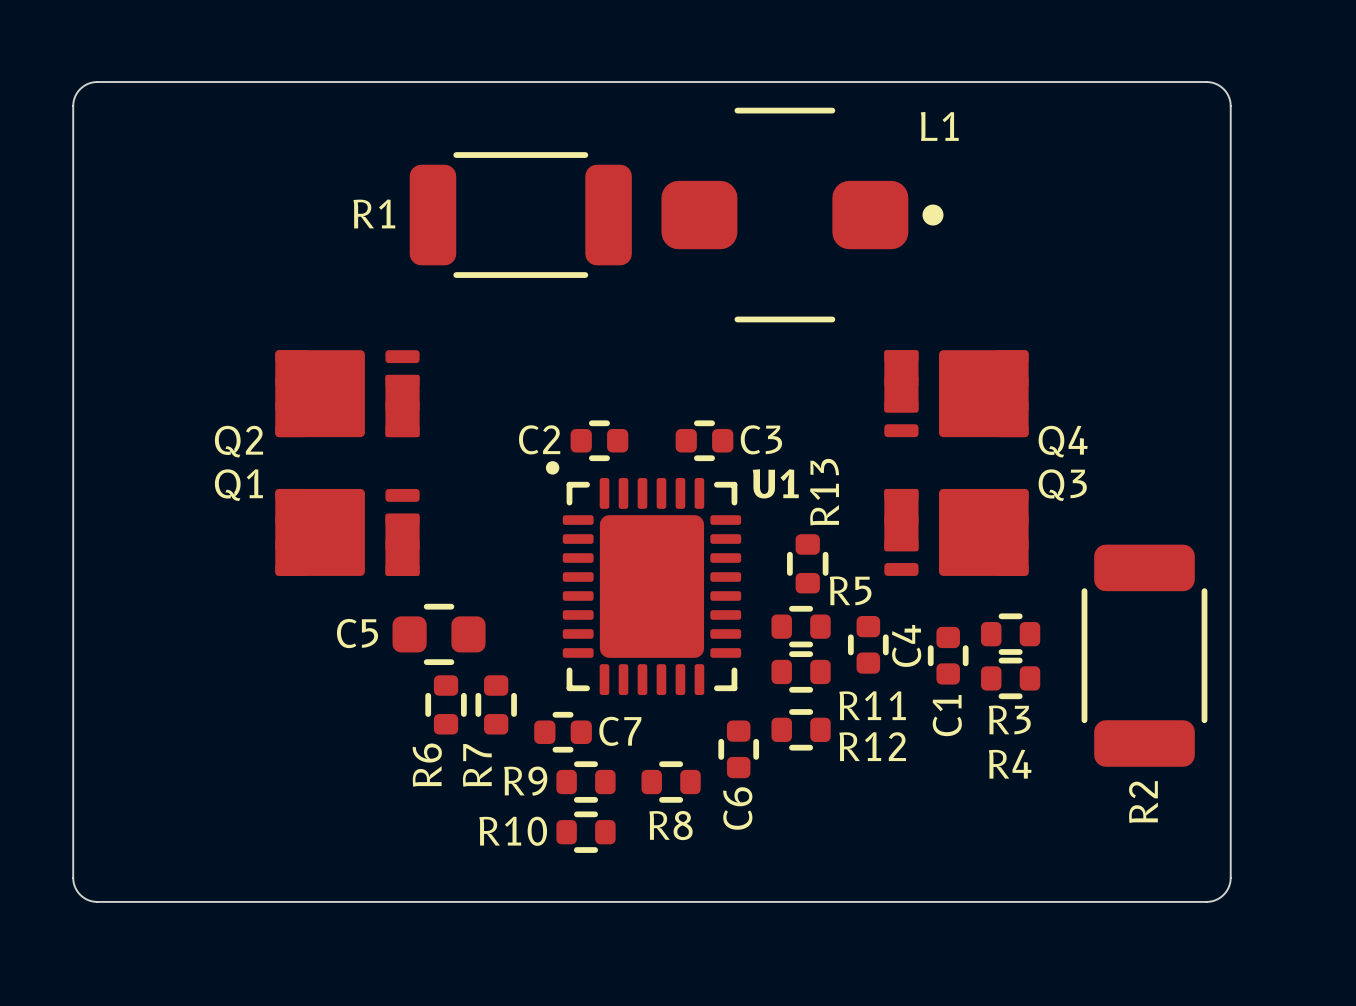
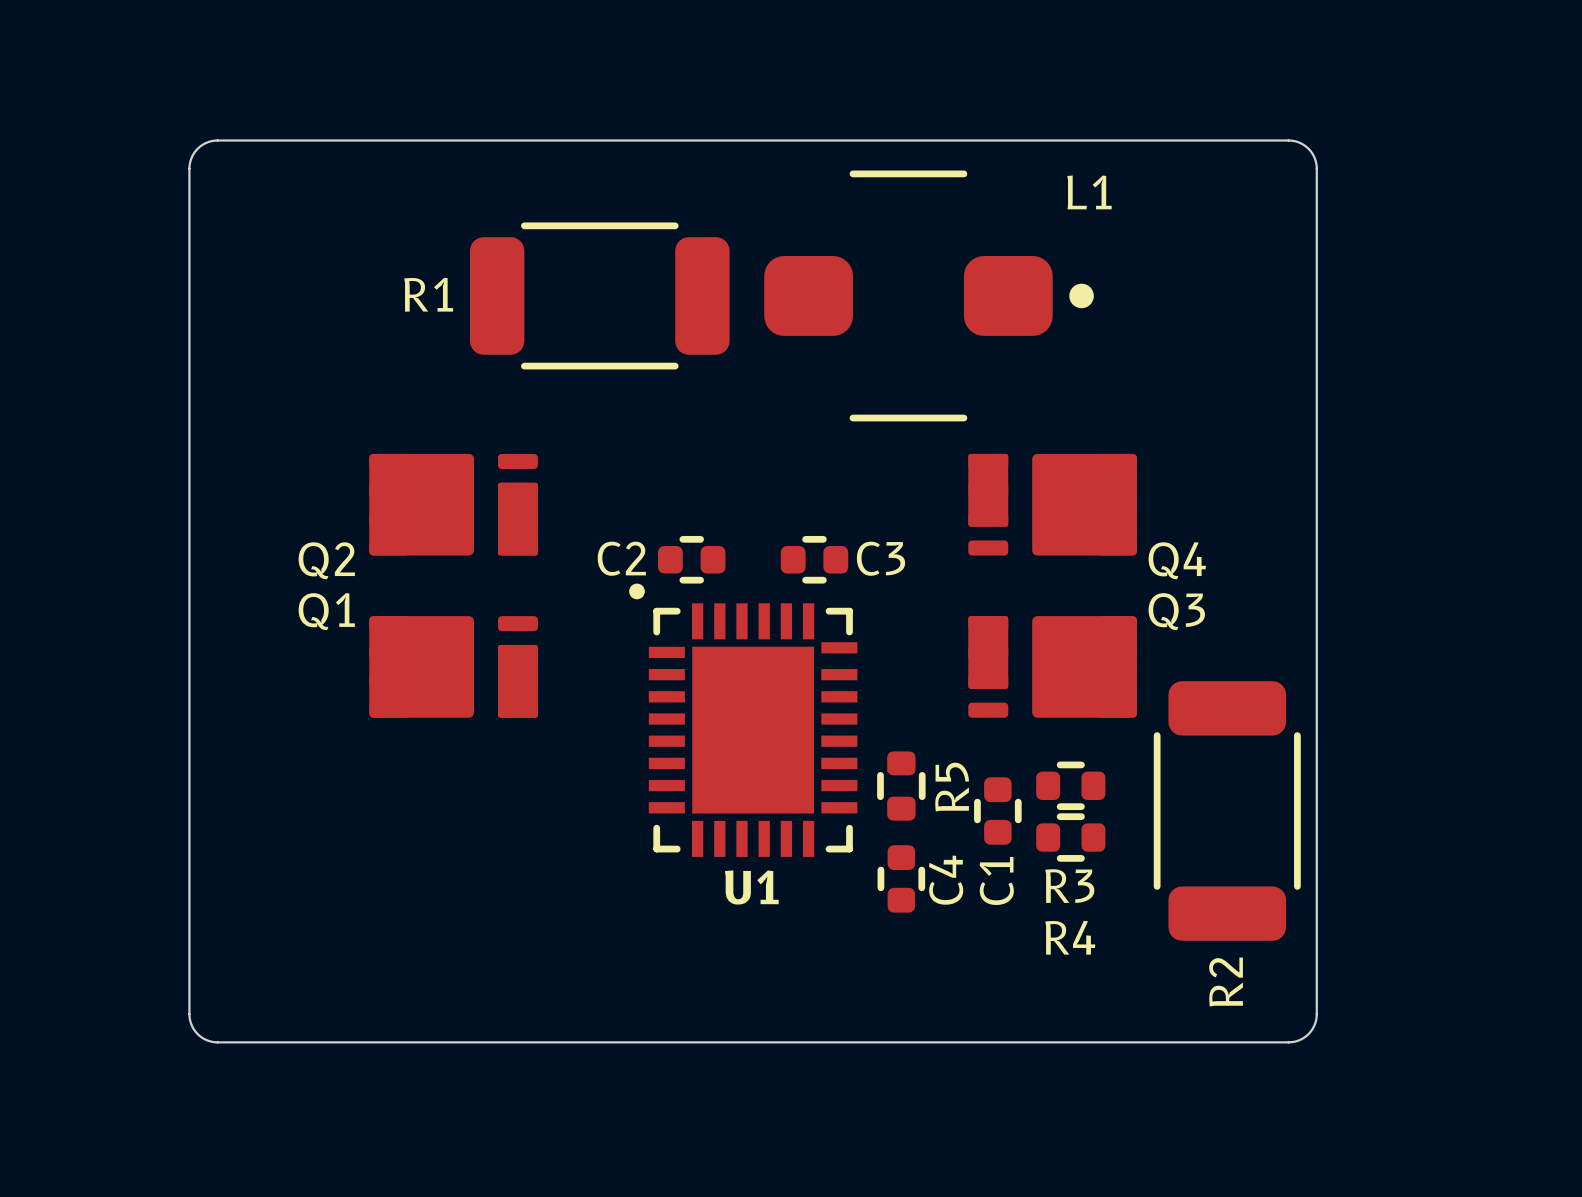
board edge: (193, 82) (91, 82) (80, 89) (73, 103) (73, 877) (78, 892) (84, 898) (94, 901) (1206, 901) (1221, 896) (1228, 888) (1230, 877) (1230, 103) (1225, 91) (1211, 82) (1110, 82) -> (217, 140) (205, 143) (197, 148) (192, 156) (189, 168) (189, 1014) (191, 1023) (197, 1034) (205, 1039) (217, 1042) (1288, 1042) (1297, 1040) (1306, 1036) (1313, 1026) (1316, 1014) (1316, 168) (1315, 159) (1308, 148) (1300, 143) (1288, 140)
Q2 position: (347, 393) -> (453, 504)
Q4 position: (956, 393) -> (1052, 504)
U1 footprint: [545, 461, 742, 696] -> [629, 583, 858, 857]
U1 name position: U1 (775, 483) -> U1 (751, 887)
Q1 position: (347, 532) -> (453, 666)
Q3 position: (956, 532) -> (1052, 666)
R13: (807, 563) -> none
R5 rotation: 0° (801, 626) -> 90° clockwise (901, 786)
C5: (439, 634) -> none
R3 position: (1010, 634) -> (1070, 785)
C4 position: (868, 644) -> (901, 878)
C1 position: (948, 655) -> (997, 810)
R2 position: (1144, 655) -> (1227, 810)
R11: (801, 671) -> none
R4 position: (1010, 678) -> (1070, 837)
R6: (446, 704) -> none
R7: (496, 704) -> none
R12: (801, 729) -> none
C7: (563, 732) -> none
C6: (738, 749) -> none
R9: (586, 782) -> none
R8: (671, 782) -> none
R10: (586, 832) -> none

